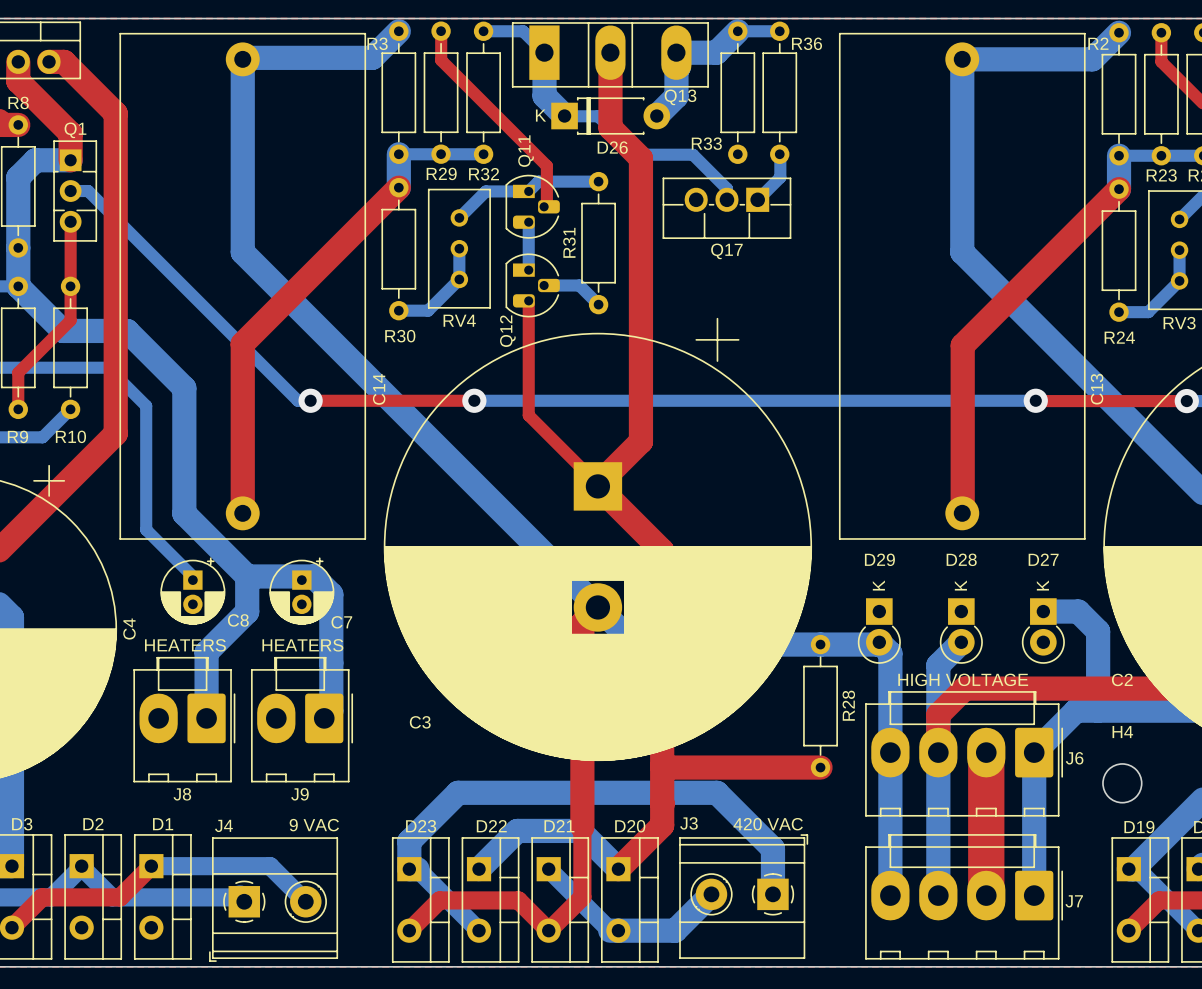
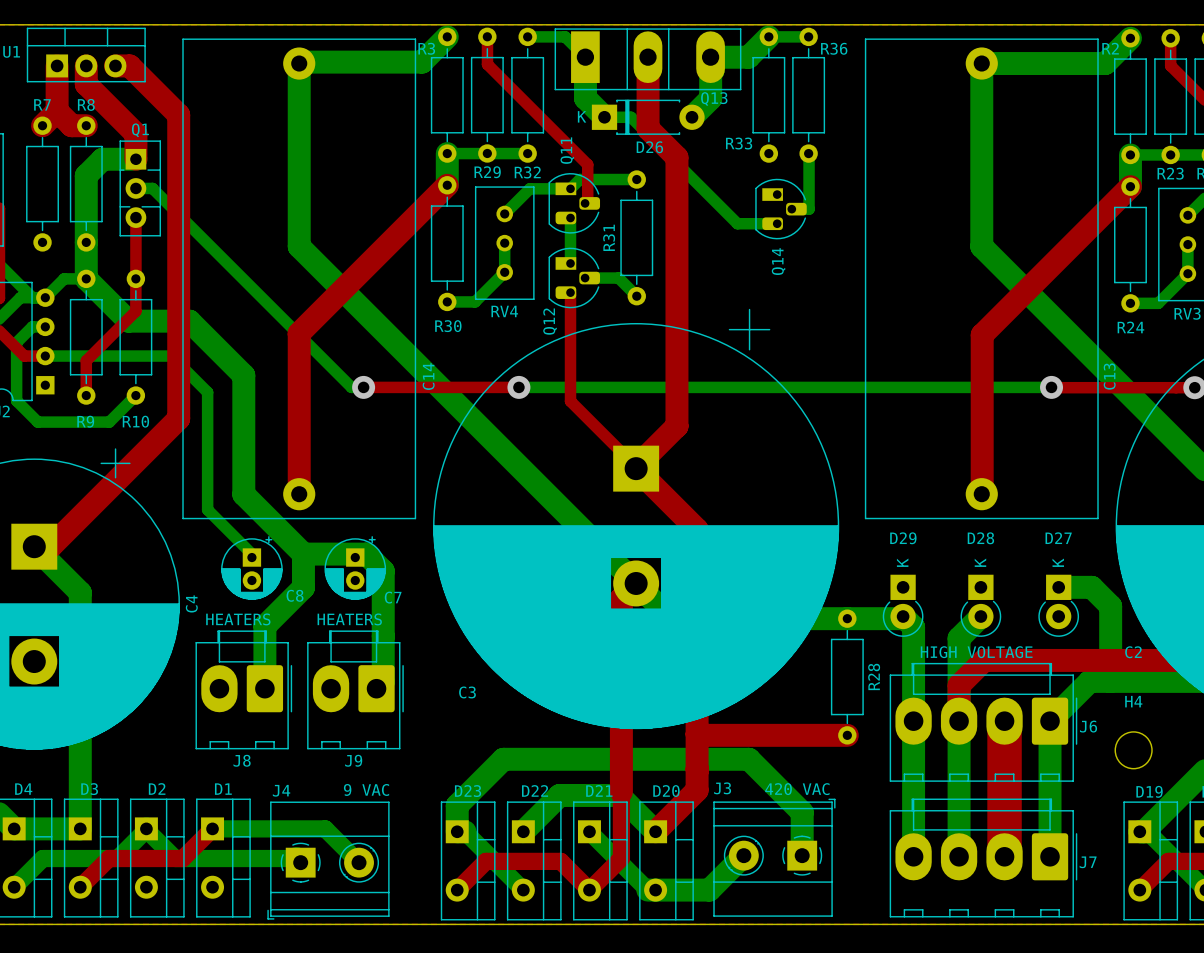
bottom track: (564, 116) (598, 116) (636, 154) (692, 154) (726, 188) (726, 198) -> (604, 117) (631, 117) (737, 223) (777, 223)
bottom track: none -> (809, 153) (809, 209) (791, 209)
bottom track: (780, 155) (780, 177) (758, 199) -> none
Q17: (726, 208) -> none
Q14: none -> (781, 209)

